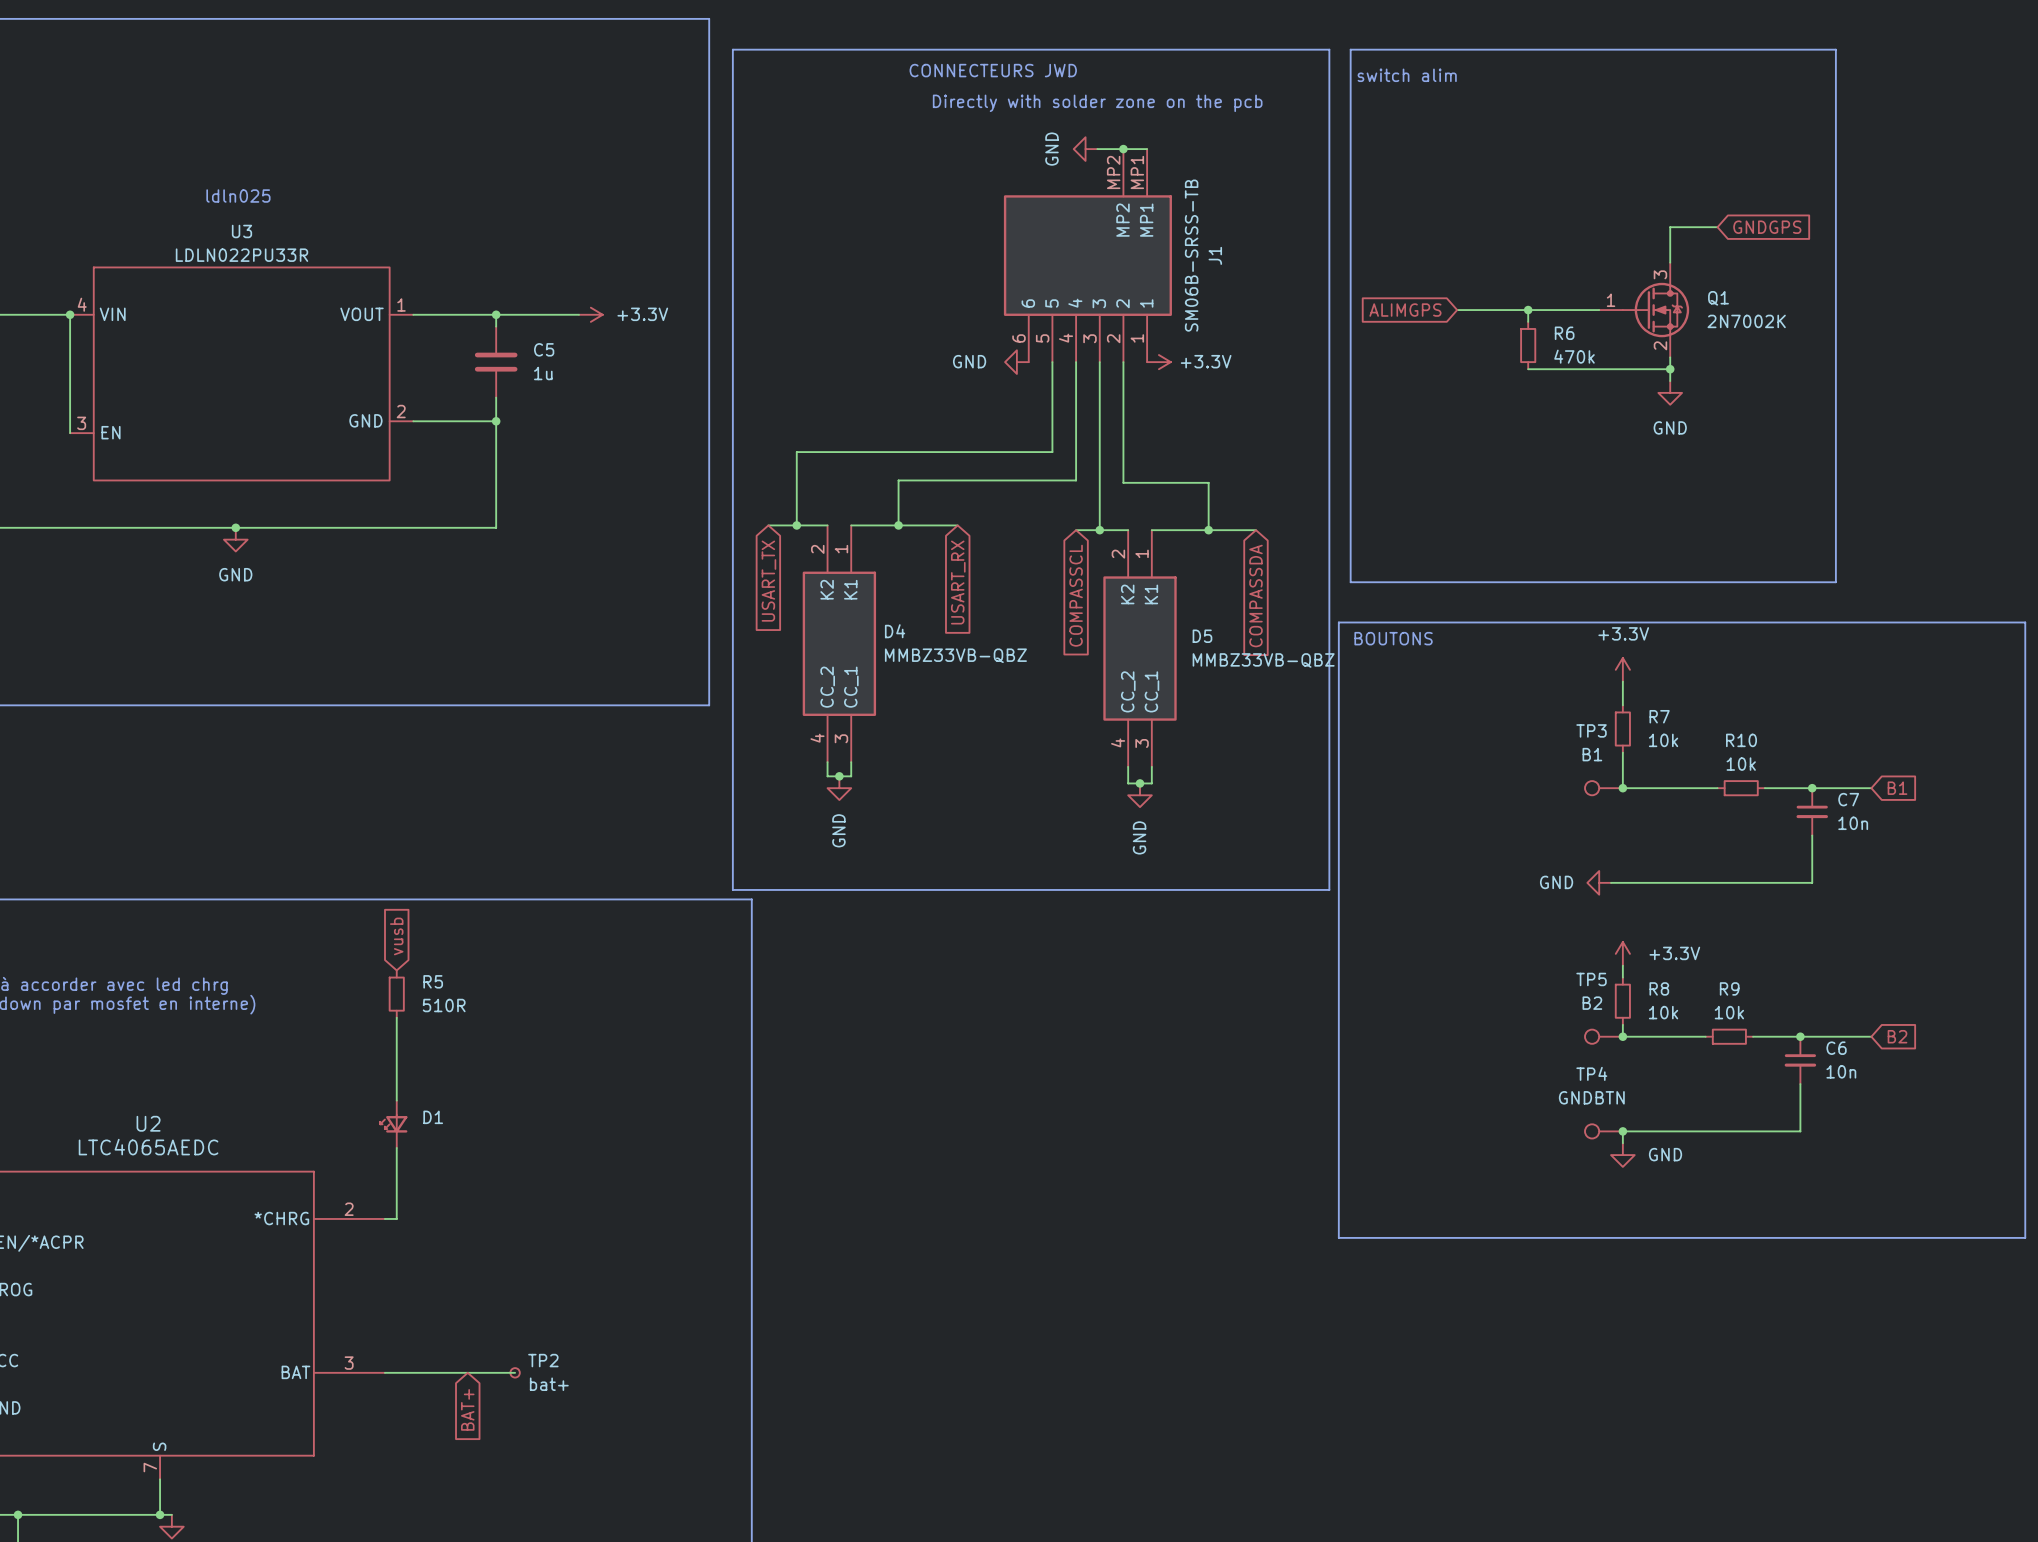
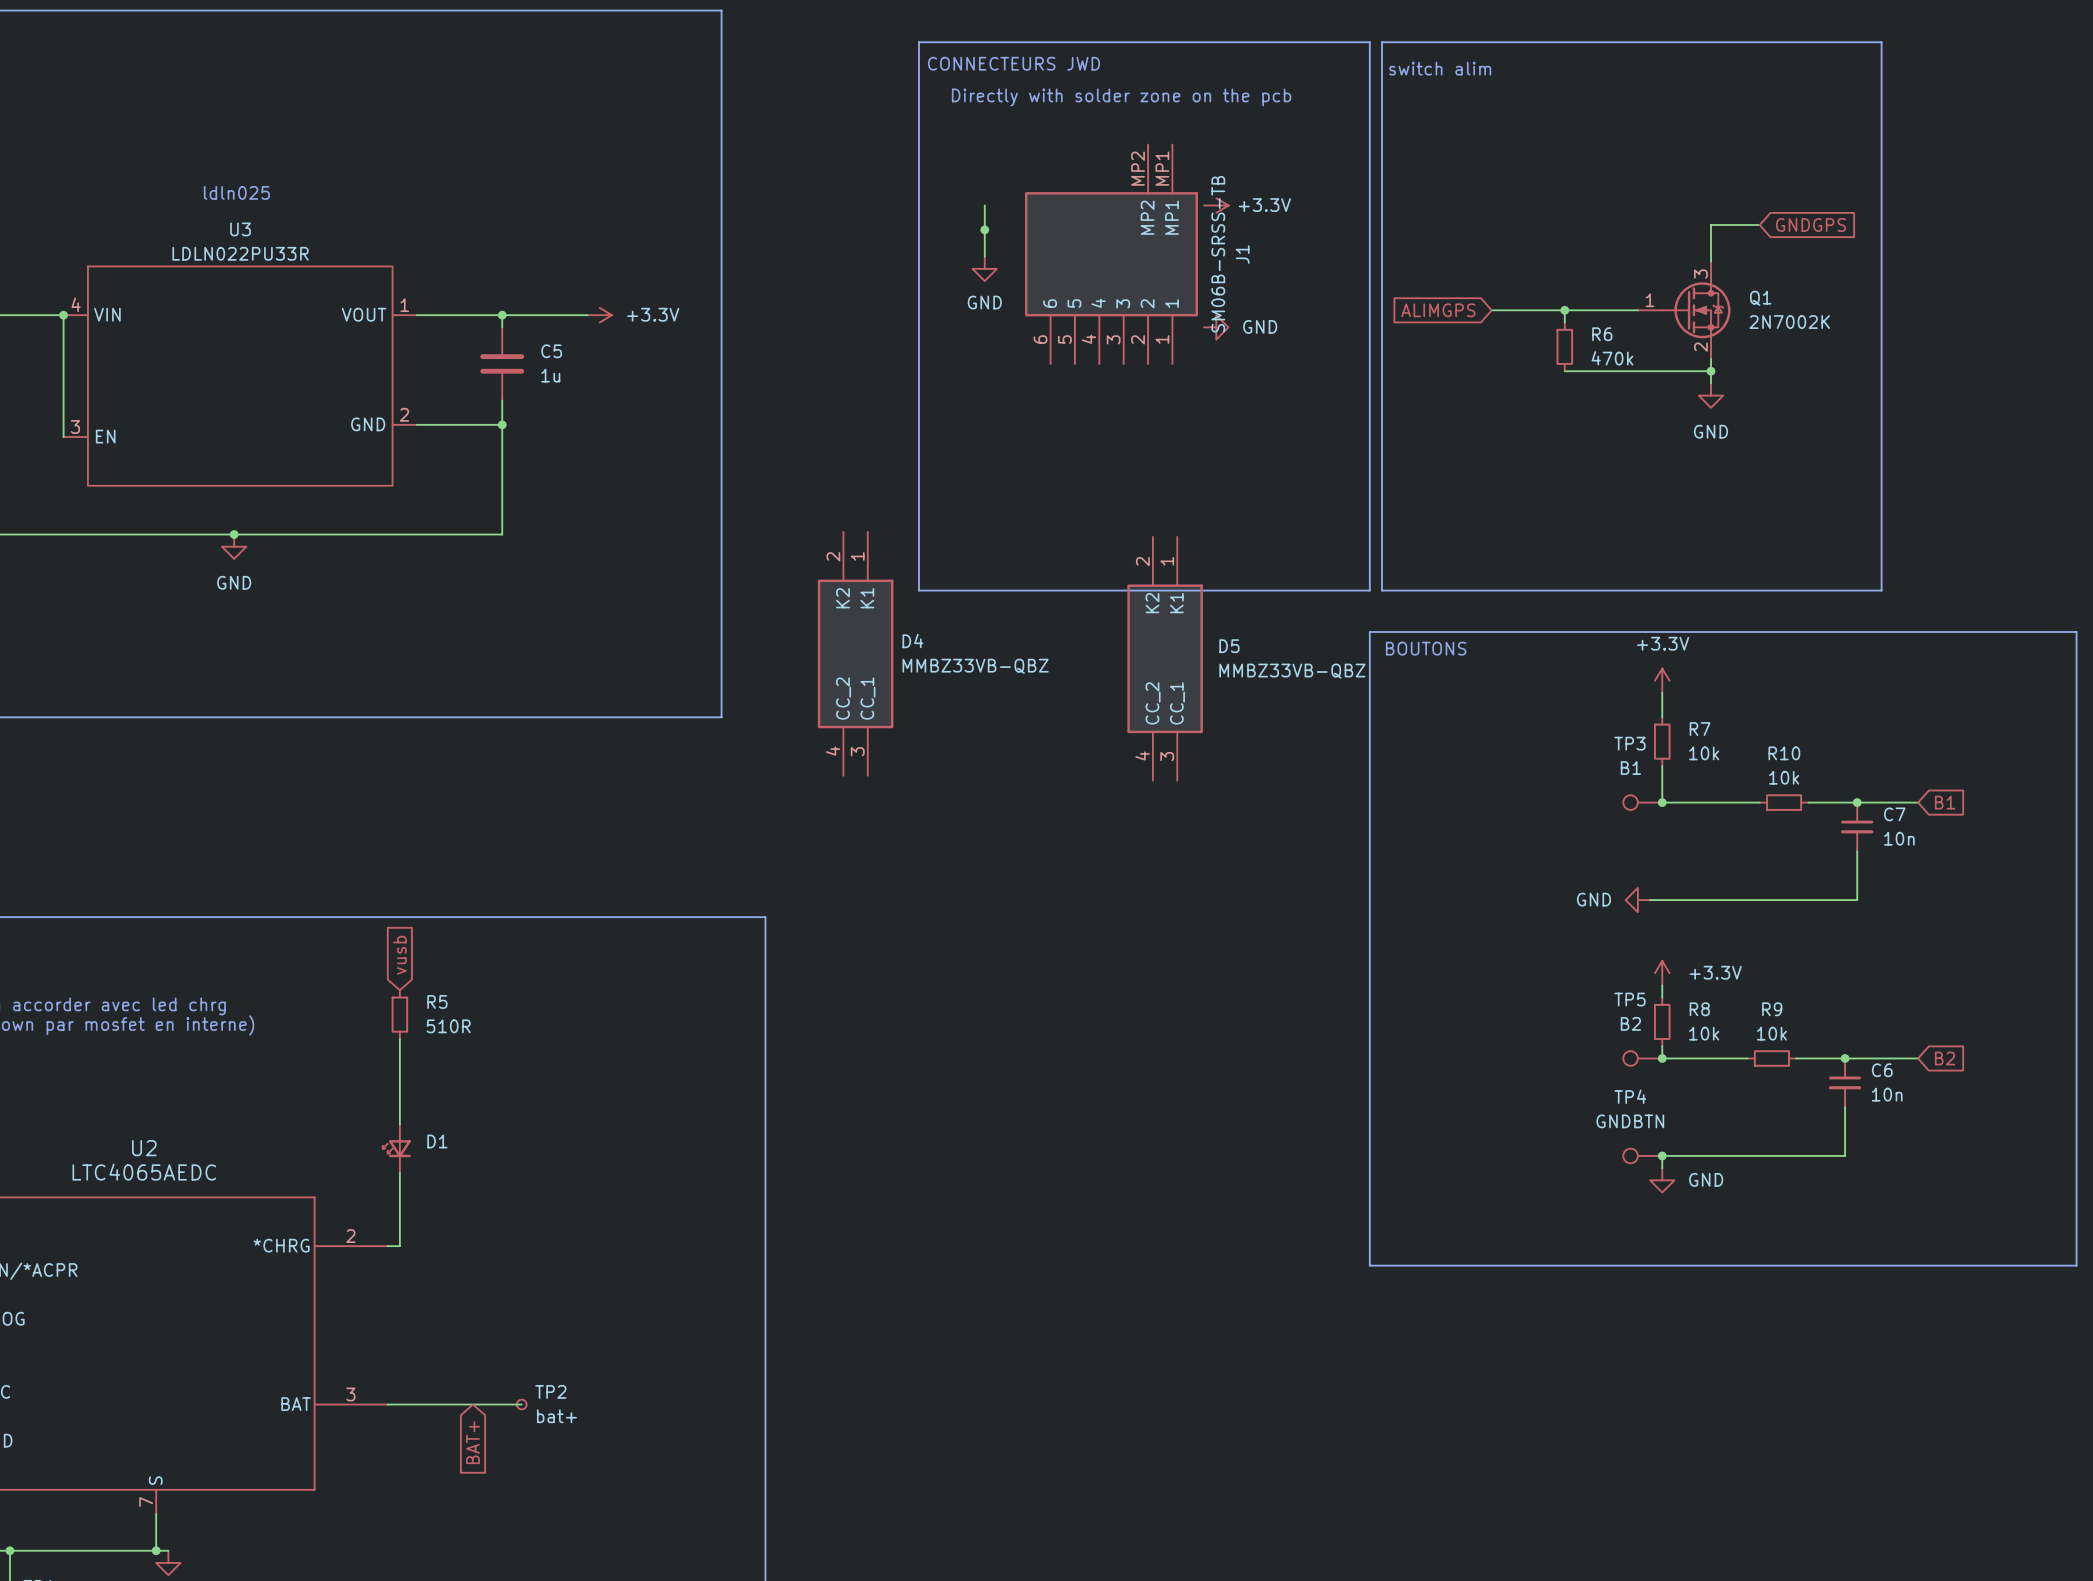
line: (900, 49) (732, 49) (732, 889) (1329, 889) (1329, 49) -> (918, 42) (918, 590) (1369, 590) (1369, 42) (1360, 42)
power symbol: GND (1085, 149) -> none
wire: (1097, 149) (1147, 149) -> none
junction: (1123, 149) -> none
wire: none -> (984, 205) (984, 256)
junction: none -> (984, 229)
power symbol: none -> GND (984, 268)
power symbol: none -> GND (1216, 327)
power symbol: GND (1016, 362) -> none
wire: (1052, 362) (1052, 452) (796, 452) (796, 525) -> none
wire: (1076, 362) (1076, 480) (898, 480) (898, 525) -> none
wire: (1099, 362) (1099, 530) -> none
wire: (1123, 362) (1123, 482) (1208, 482) (1208, 530) -> none
power symbol position: +3.3V (1158, 362) -> +3.3V (1216, 205)
wire: (768, 525) (827, 525) -> none
junction: (796, 525) -> none
wire: (851, 525) (957, 525) -> none
junction: (898, 525) -> none
wire: (1076, 530) (1128, 530) -> none
junction: (1099, 530) -> none
wire: (1151, 530) (1255, 530) -> none
junction: (1208, 530) -> none
global label: USART_TX (768, 581) -> none
global label: USART_RX (958, 582) -> none
global label: COMPASSCL (1076, 595) -> none
global label: COMPASSDA (1255, 595) -> none
wire: (827, 762) (827, 776) (851, 776) (851, 762) -> none
wire: (1128, 766) (1128, 783) (1151, 783) (1151, 766) -> none
junction: (839, 776) -> none
junction: (1140, 783) -> none
power symbol: GND (839, 788) -> none
power symbol: GND (1140, 795) -> none

